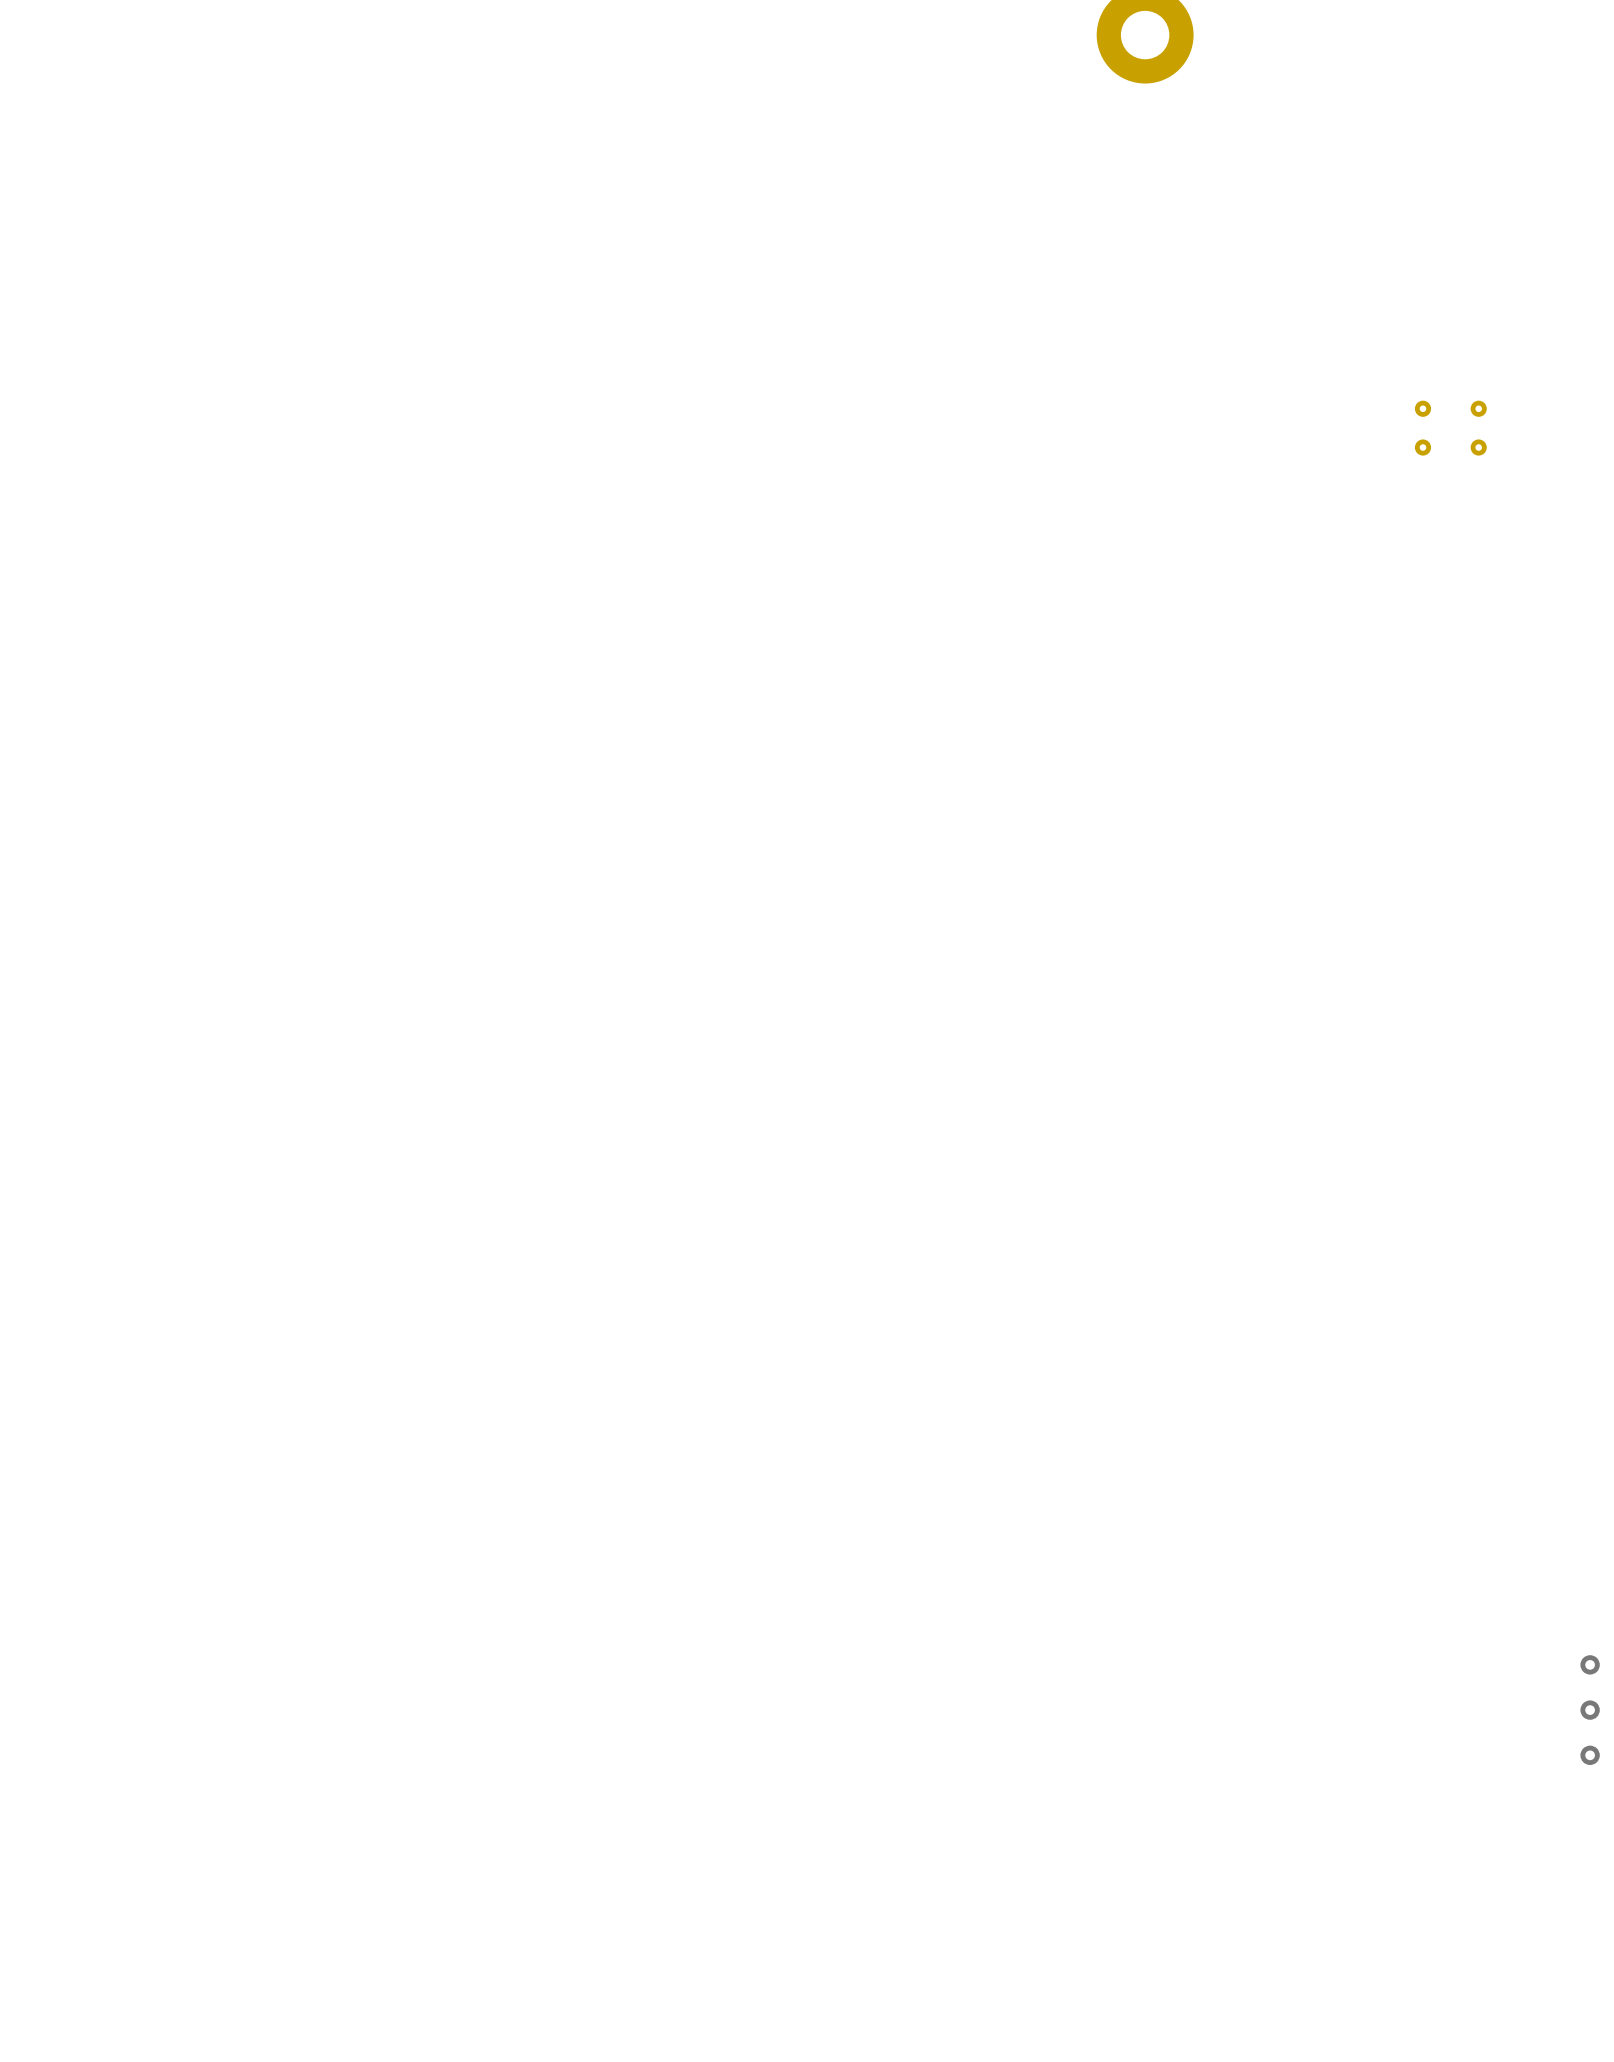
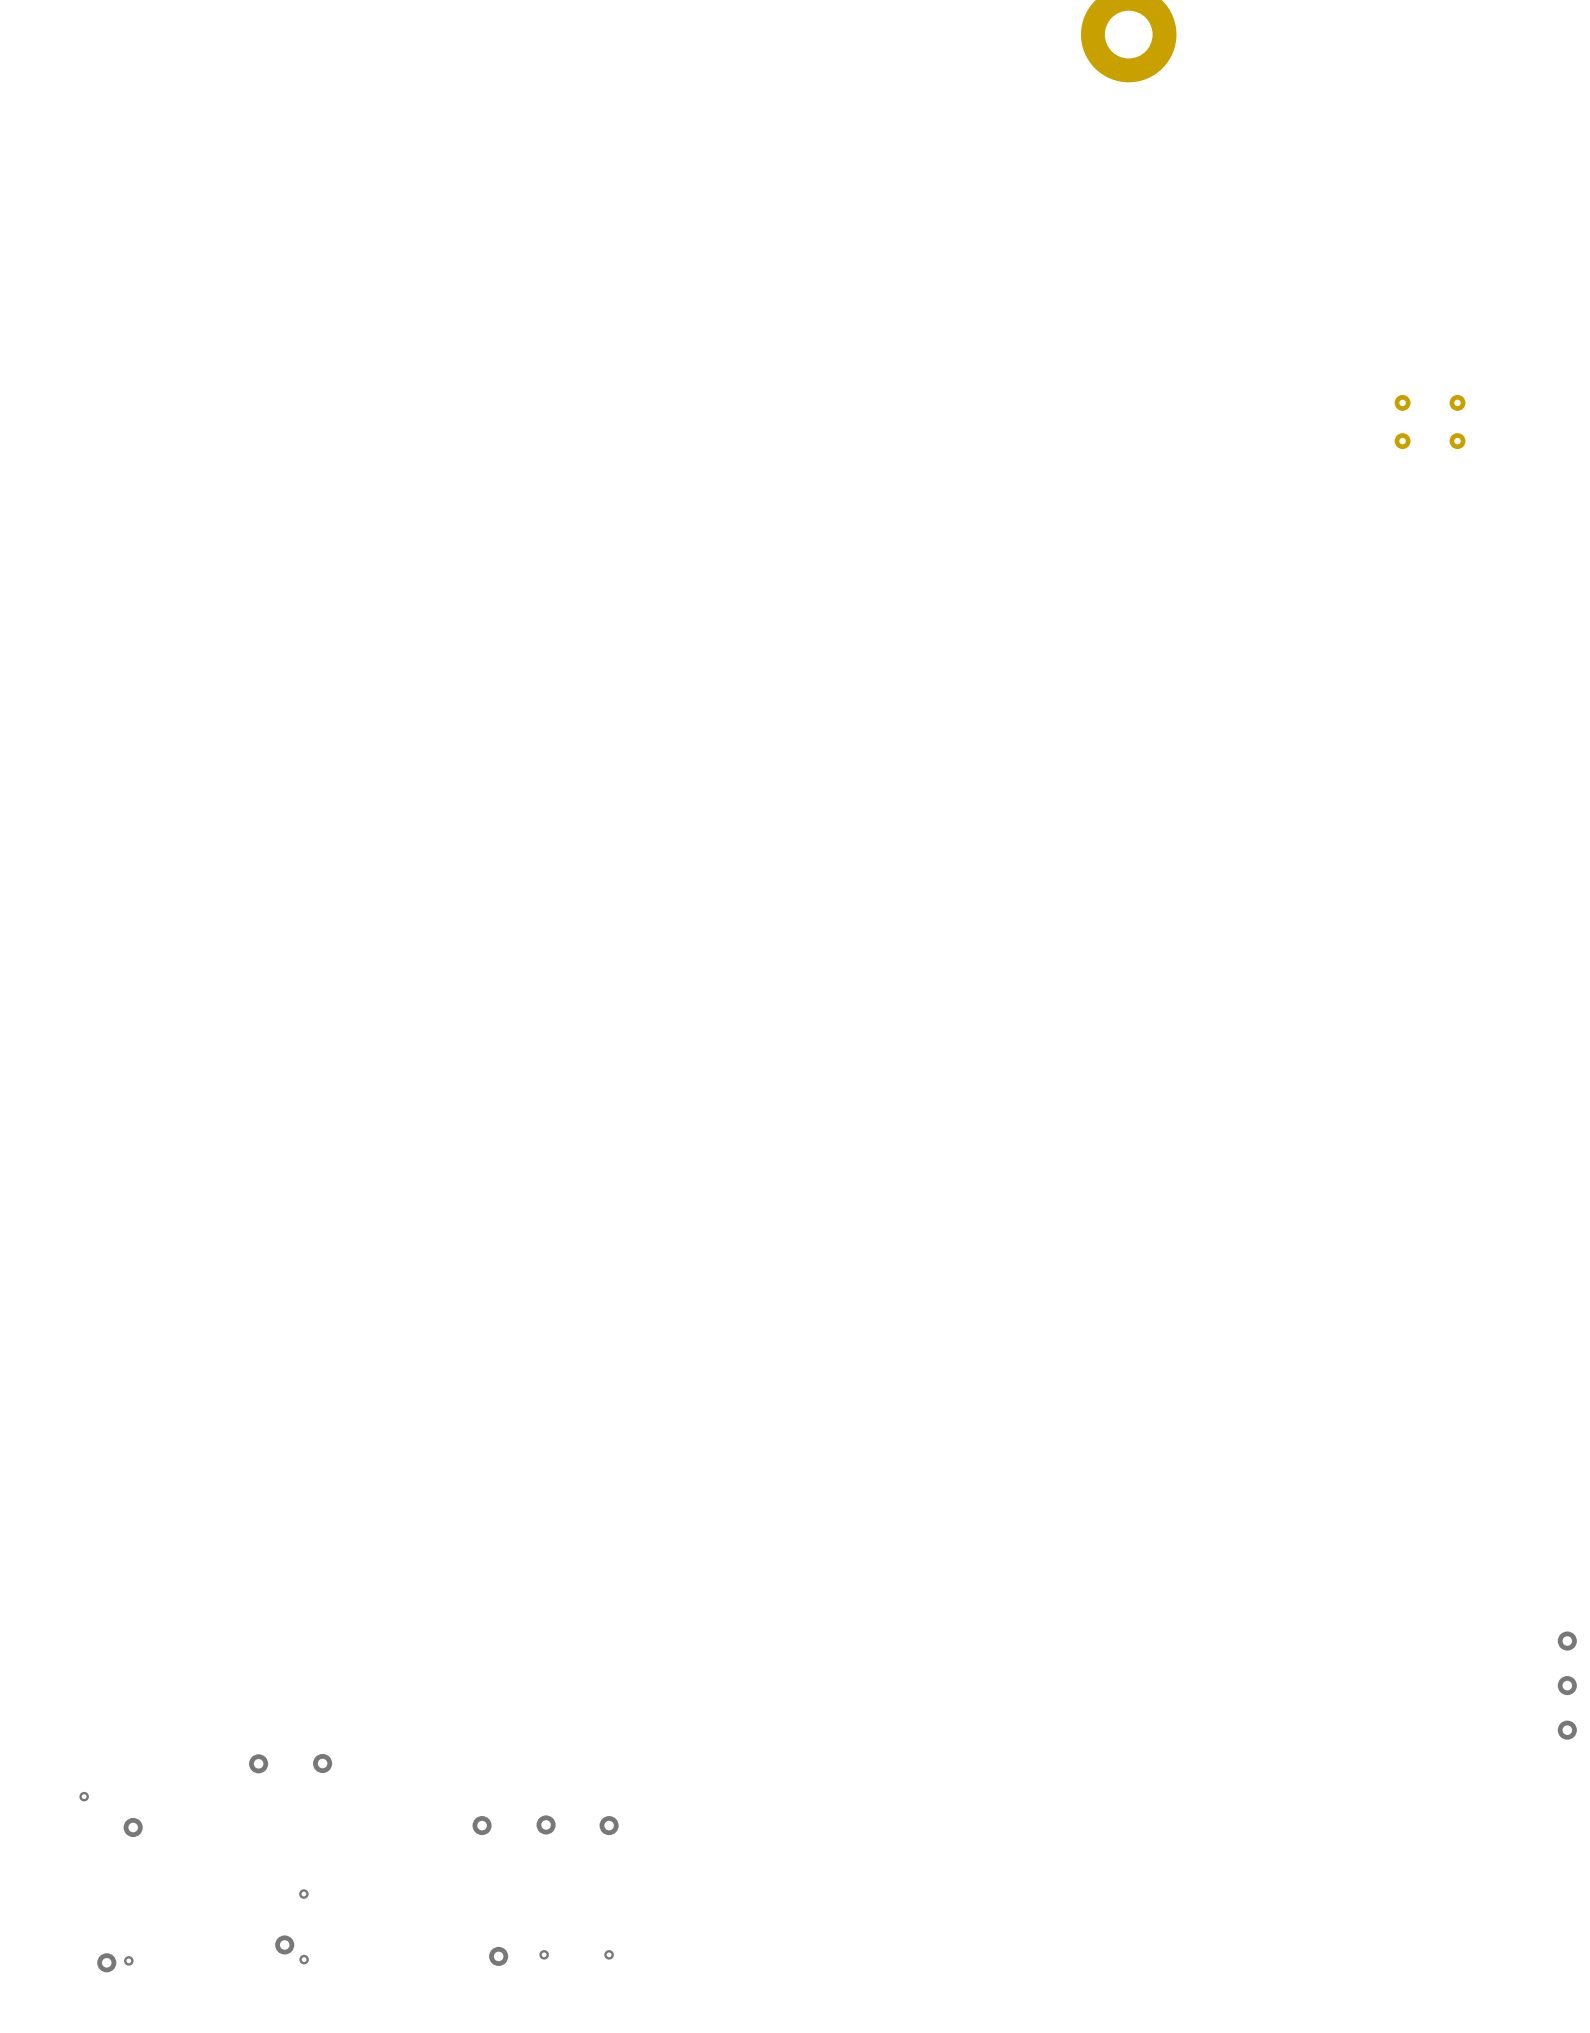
via: none -> (258, 1763)
via: none -> (322, 1763)
via: none -> (84, 1796)
via: none -> (546, 1824)
via: none -> (482, 1825)
via: none -> (609, 1825)
via: none -> (133, 1827)
via: none -> (303, 1894)
via: none -> (284, 1944)
via: none -> (544, 1954)
via: none -> (609, 1954)
via: none -> (498, 1956)
via: none -> (304, 1959)
via: none -> (128, 1960)
via: none -> (106, 1962)

